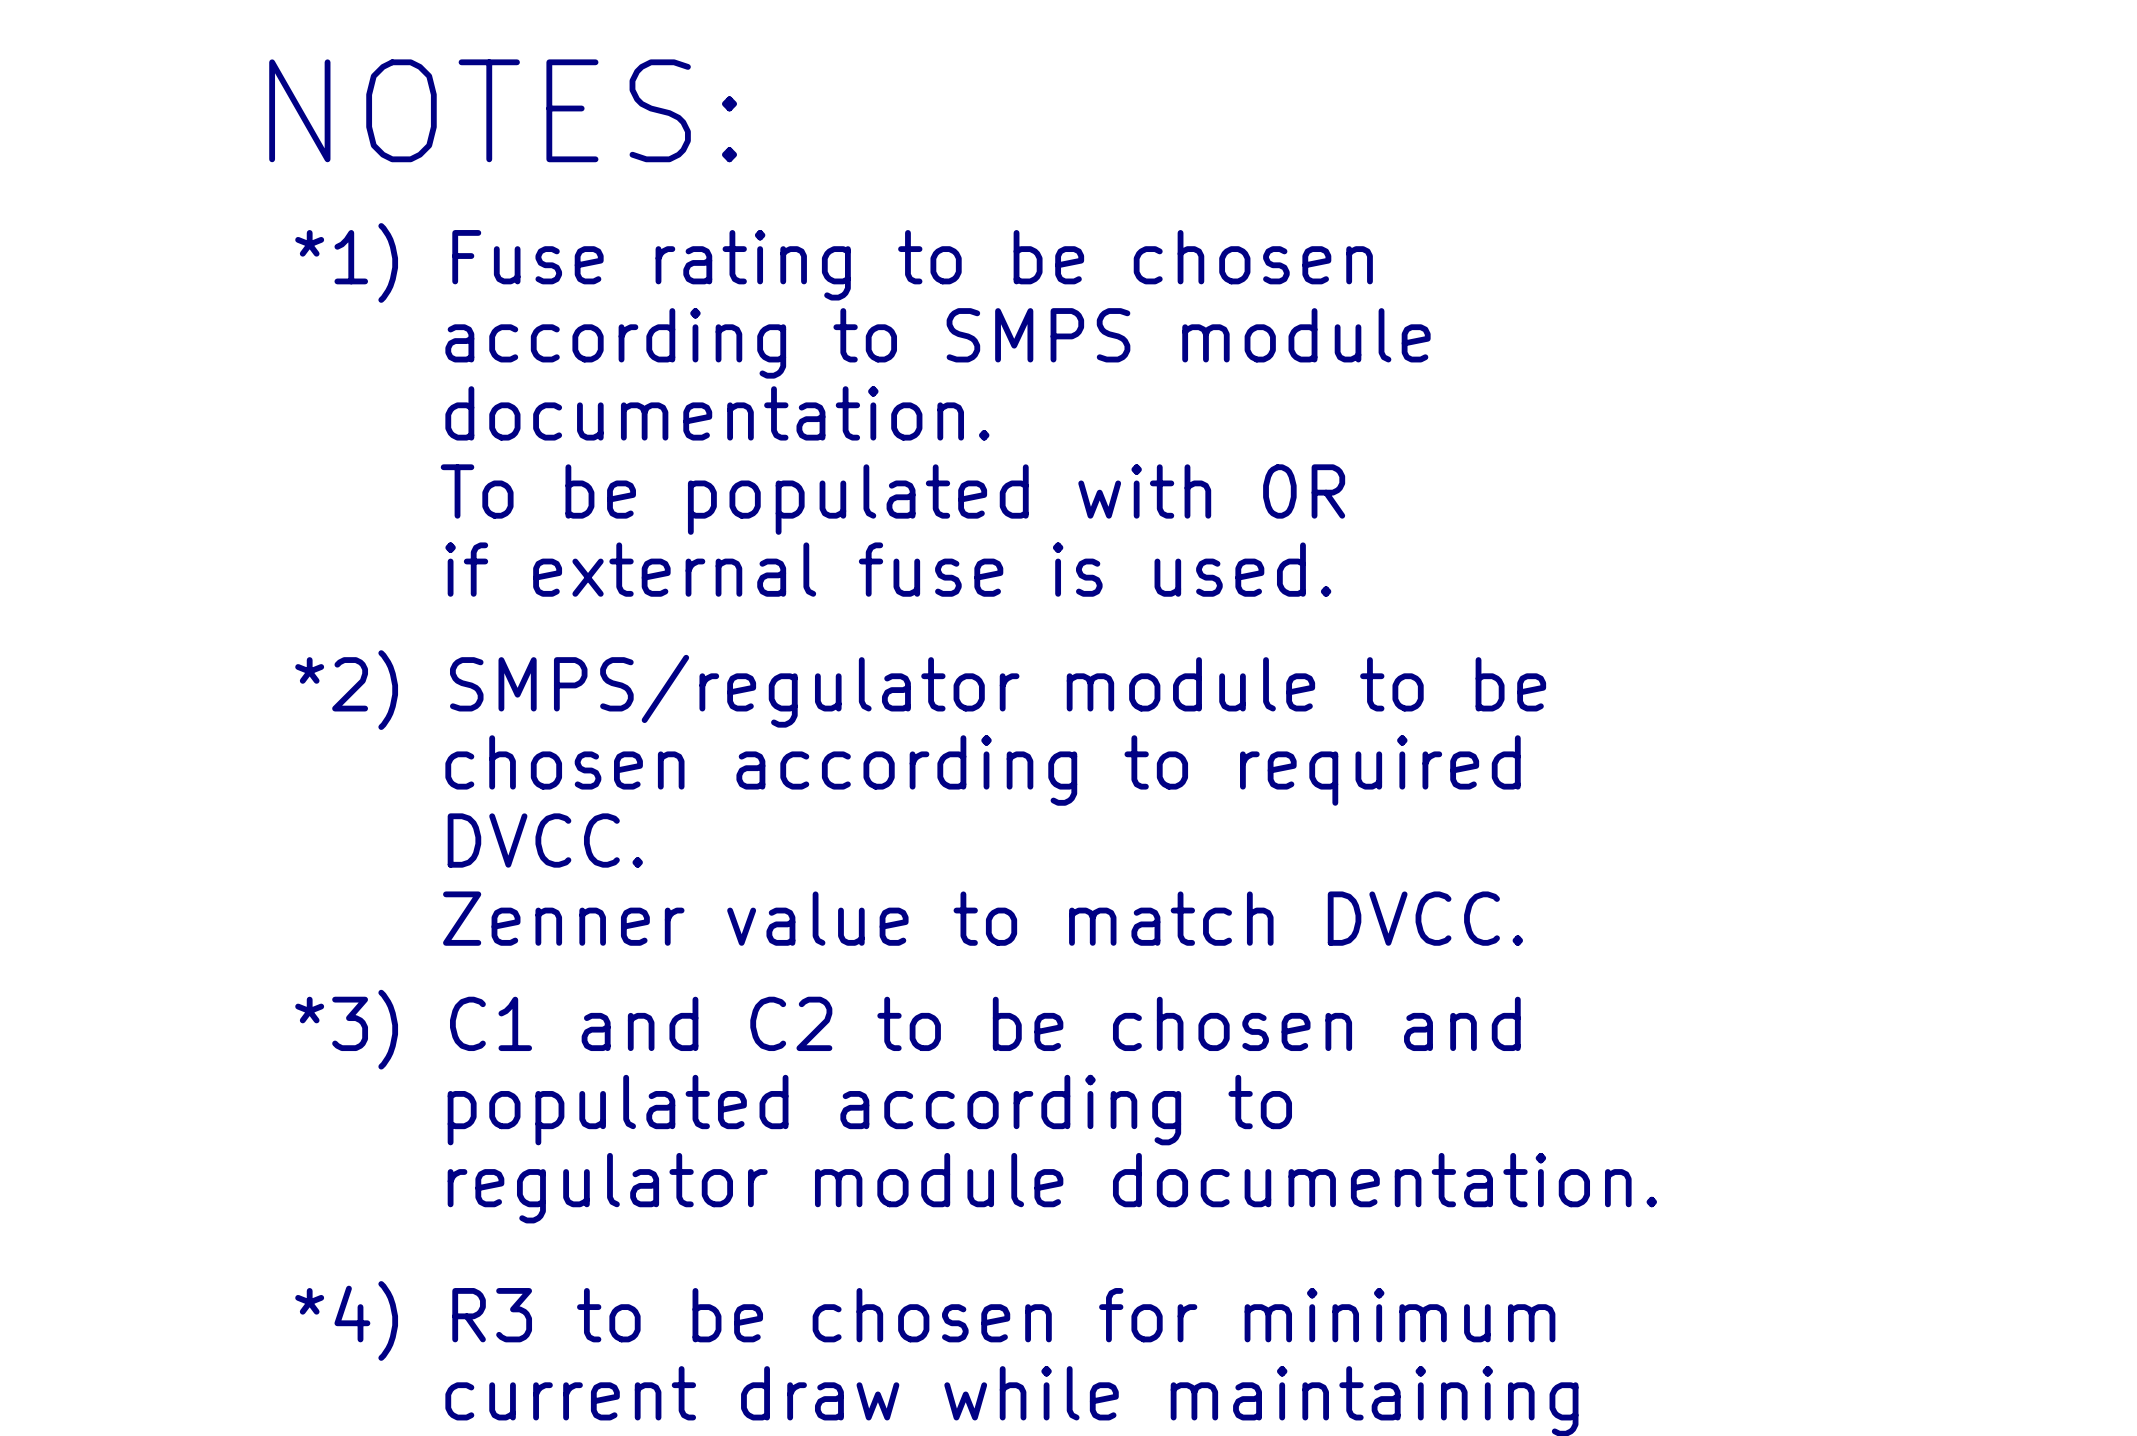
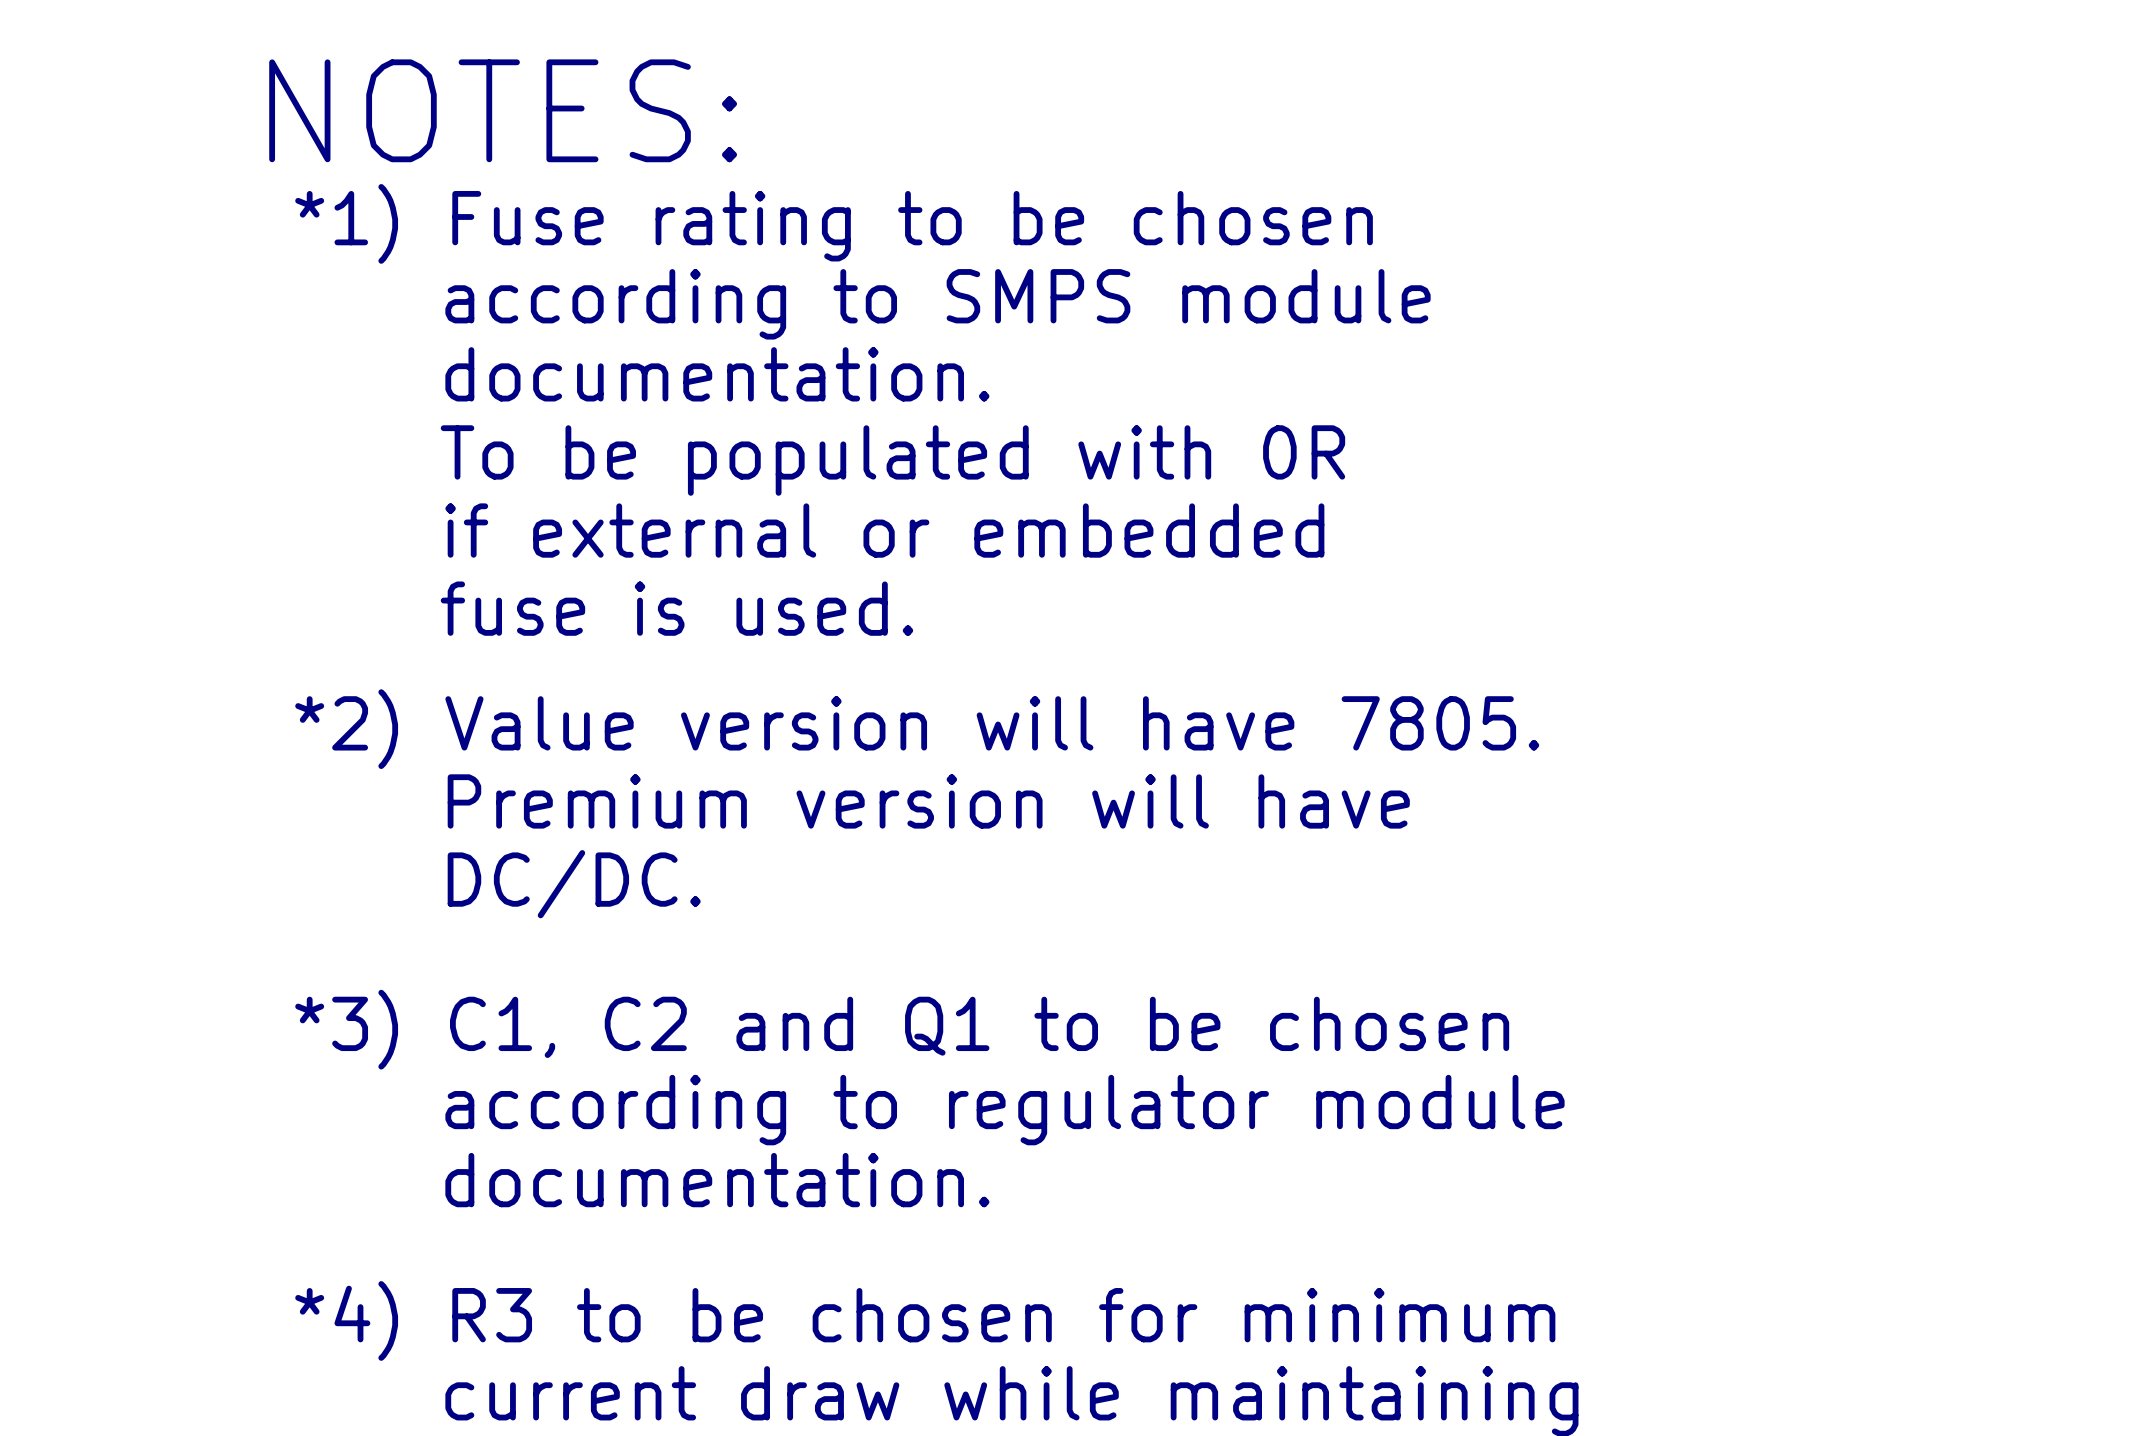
text position: *1) Fuse rating to be chosen (834, 262) -> *1) Fuse rating to be chosen (834, 223)
text position: according to SMPS module (938, 343) -> according to SMPS module (938, 304)
text position: documentation. (717, 413) -> documentation. (717, 374)
text position: To be populated with 0R (892, 499) -> To be populated with 0R (892, 460)
text: none -> if external or embedded (884, 530)
text: if external fuse is used. (888, 569) -> none
text: none -> fuse is used. (676, 608)
text: *2) SMPS/regulator module to be (920, 690) -> none
text: none -> *2) Value version will have 7805. (917, 729)
text: chosen according to required (983, 770) -> none
text: none -> Premium version will have (928, 801)
text: DVCC. (545, 840) -> DC/DC. (574, 884)
text: Zenner value to match DVCC. (983, 918) -> none
text: *3) C1 and C2 to be chosen and (907, 1029) -> *3) C1, C2 and Q1 to be chosen (902, 1029)
text: populated according to (869, 1110) -> according to regulator module (1004, 1110)
text: regulator module documentation. (1052, 1188) -> documentation. (717, 1180)

